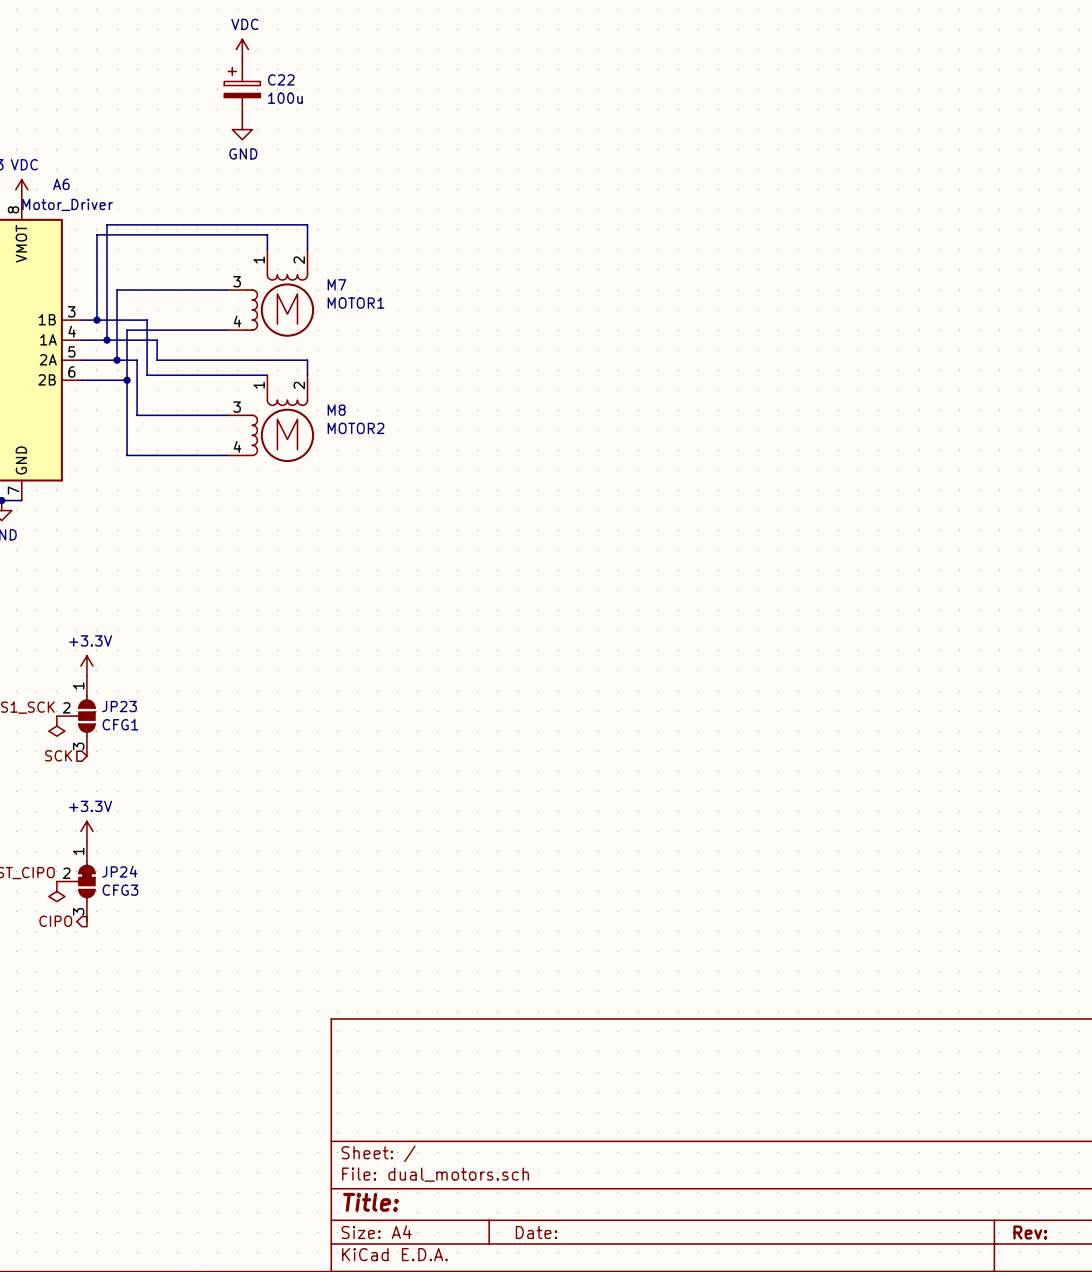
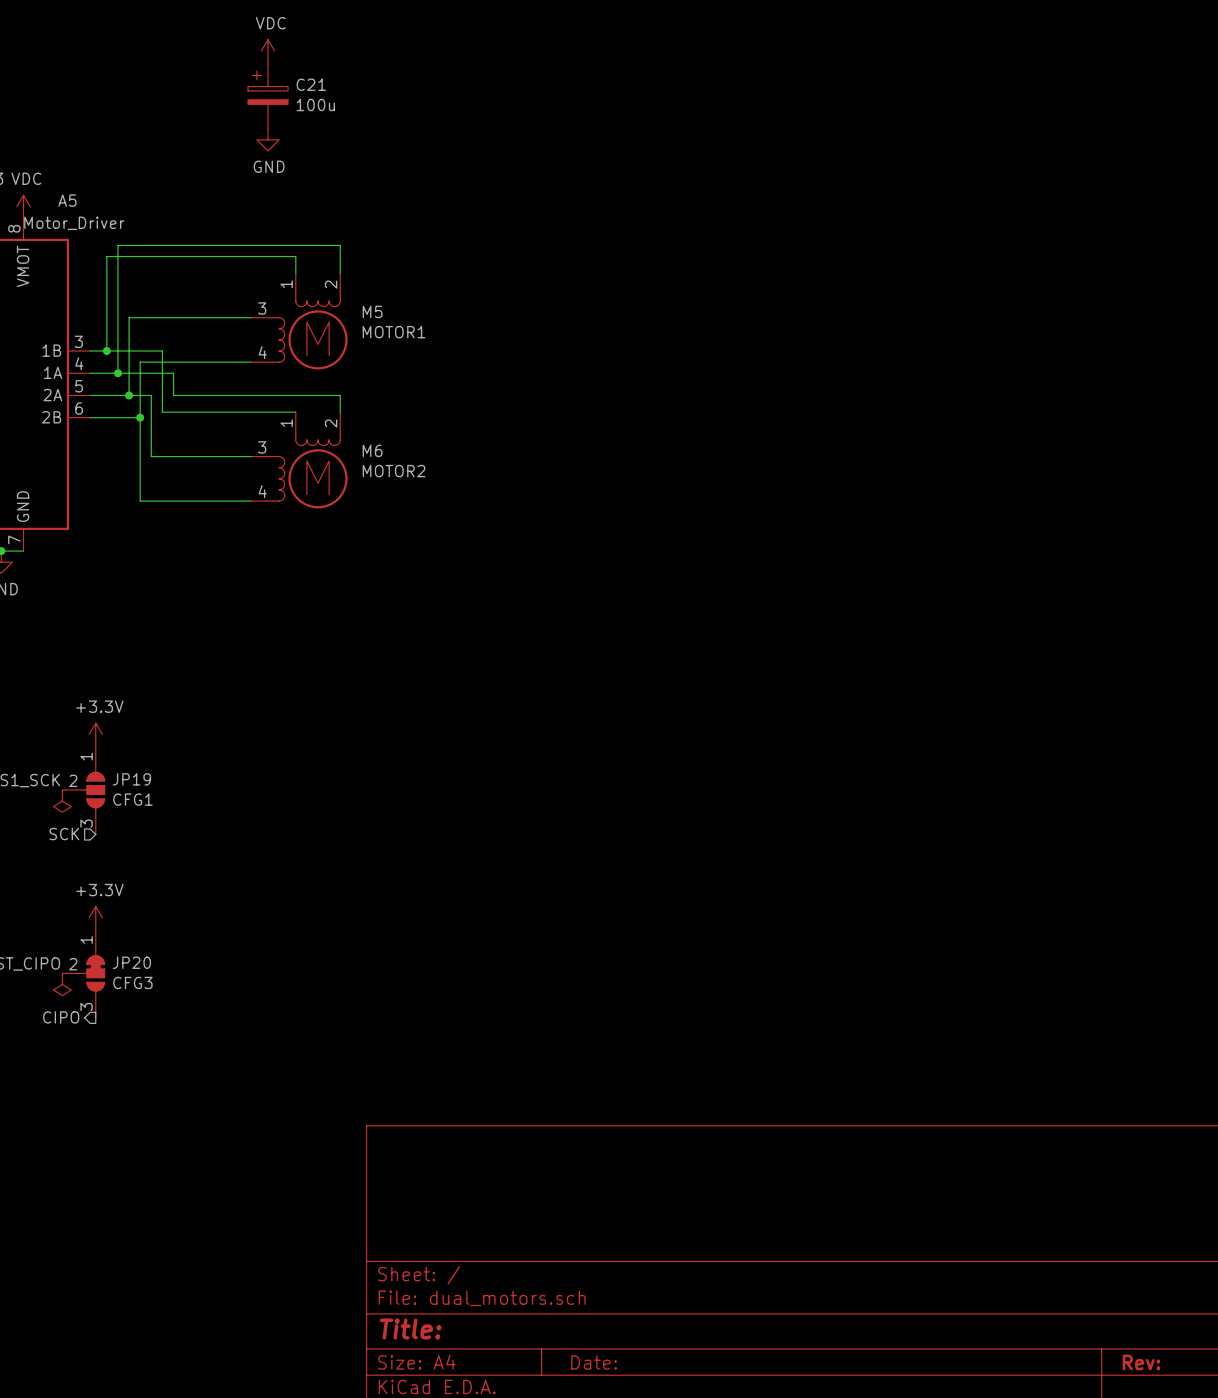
C22 name: C22 (281, 79) -> C21 (311, 84)
A6 name: A6 (61, 184) -> A5 (67, 200)
M7 name: M7 (336, 284) -> M5 (372, 311)
M8 name: M8 (336, 410) -> M6 (372, 450)
JP23 name: JP23 (119, 706) -> JP19 (131, 779)
JP24 name: JP24 (119, 871) -> JP20 (131, 962)

